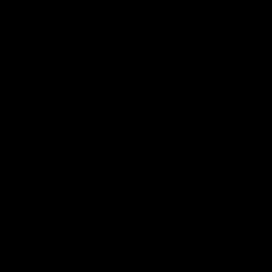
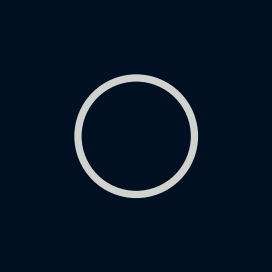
round board edge: none -> [74, 74, 199, 199]

